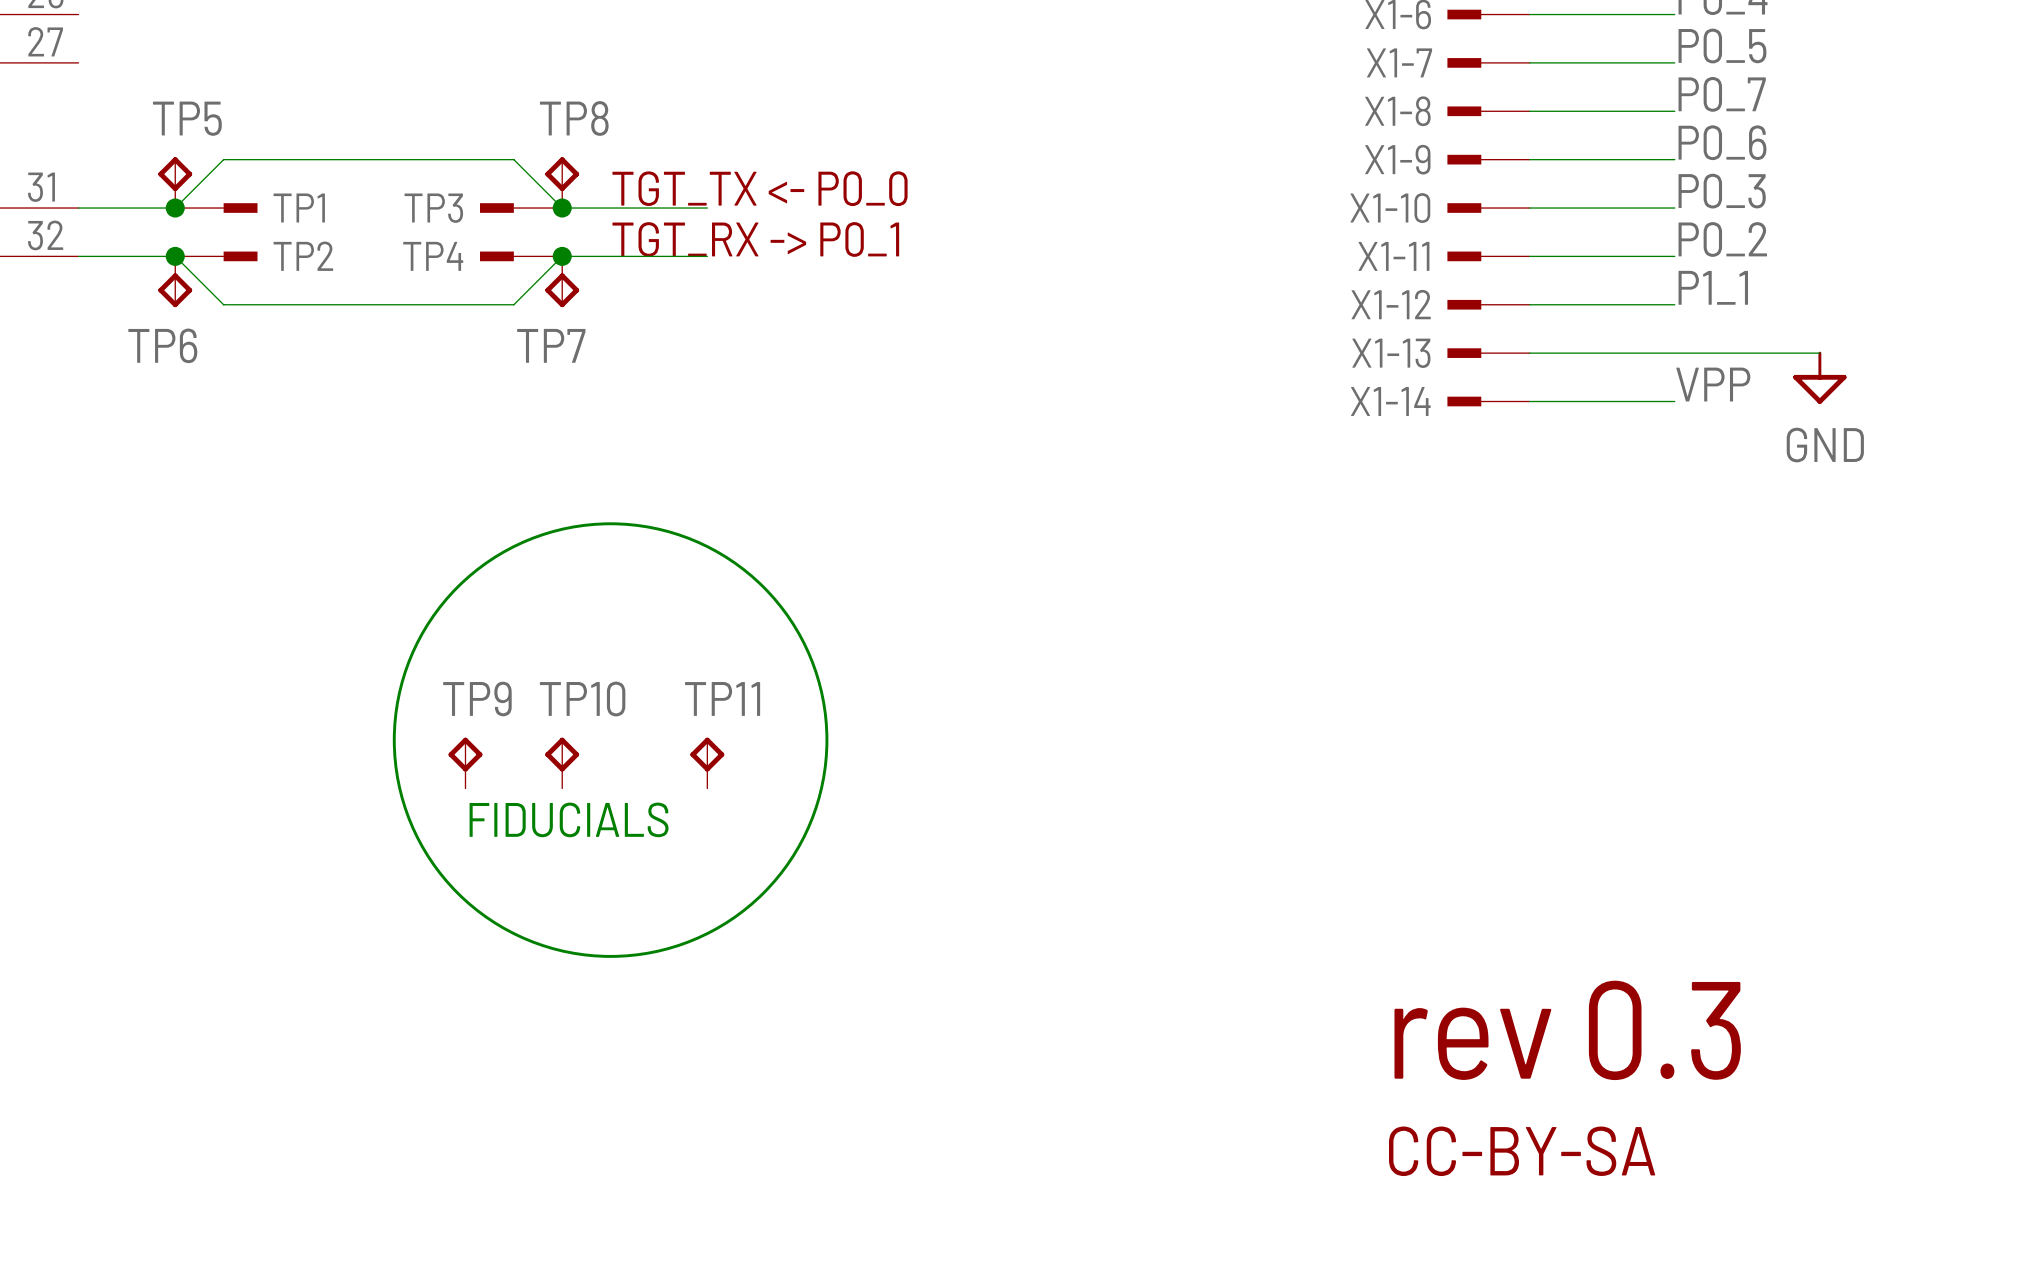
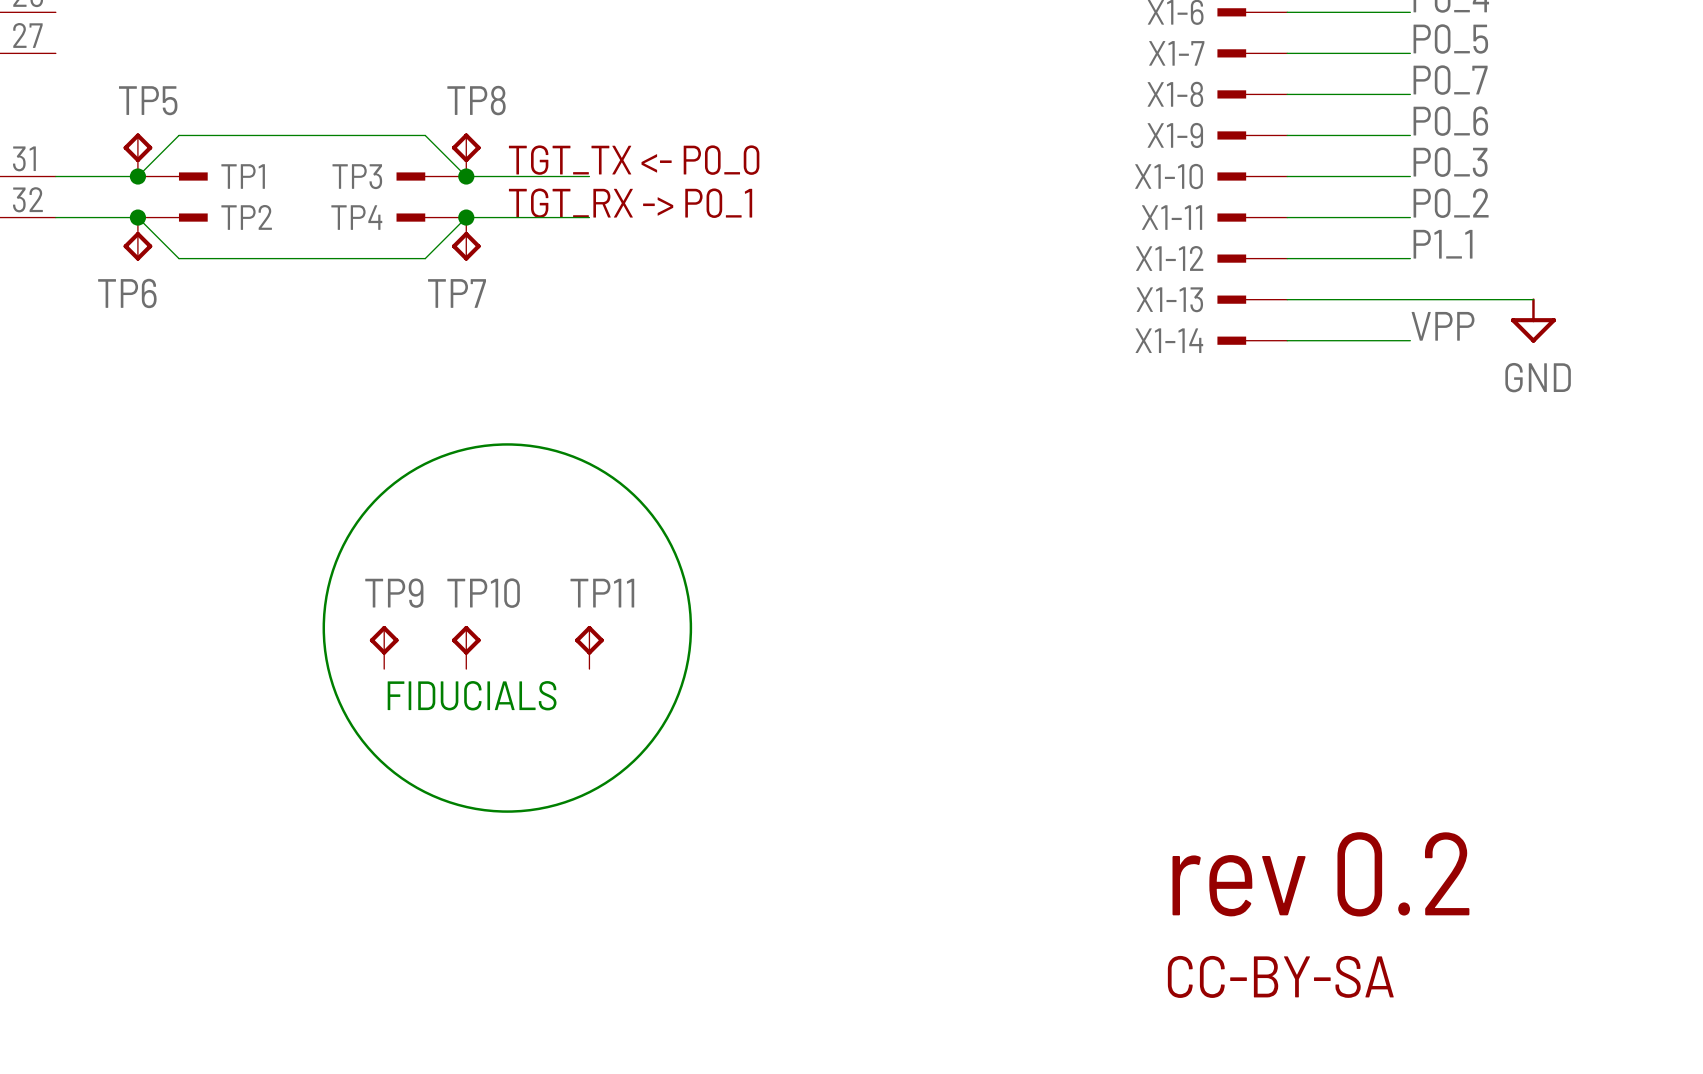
text: rev 0.3 (1567, 1030) -> rev 0.2 (1320, 874)

